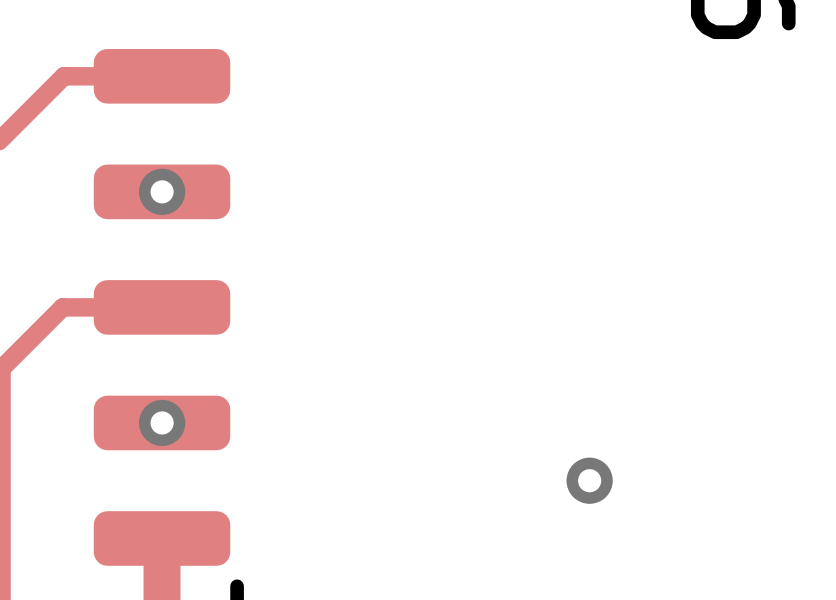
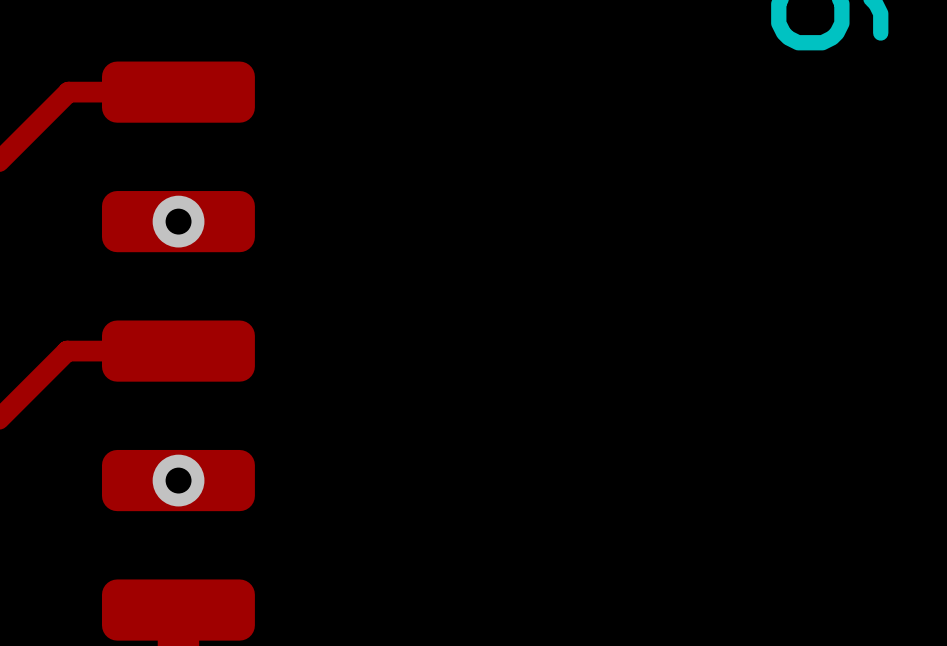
via: (589, 480) -> none

